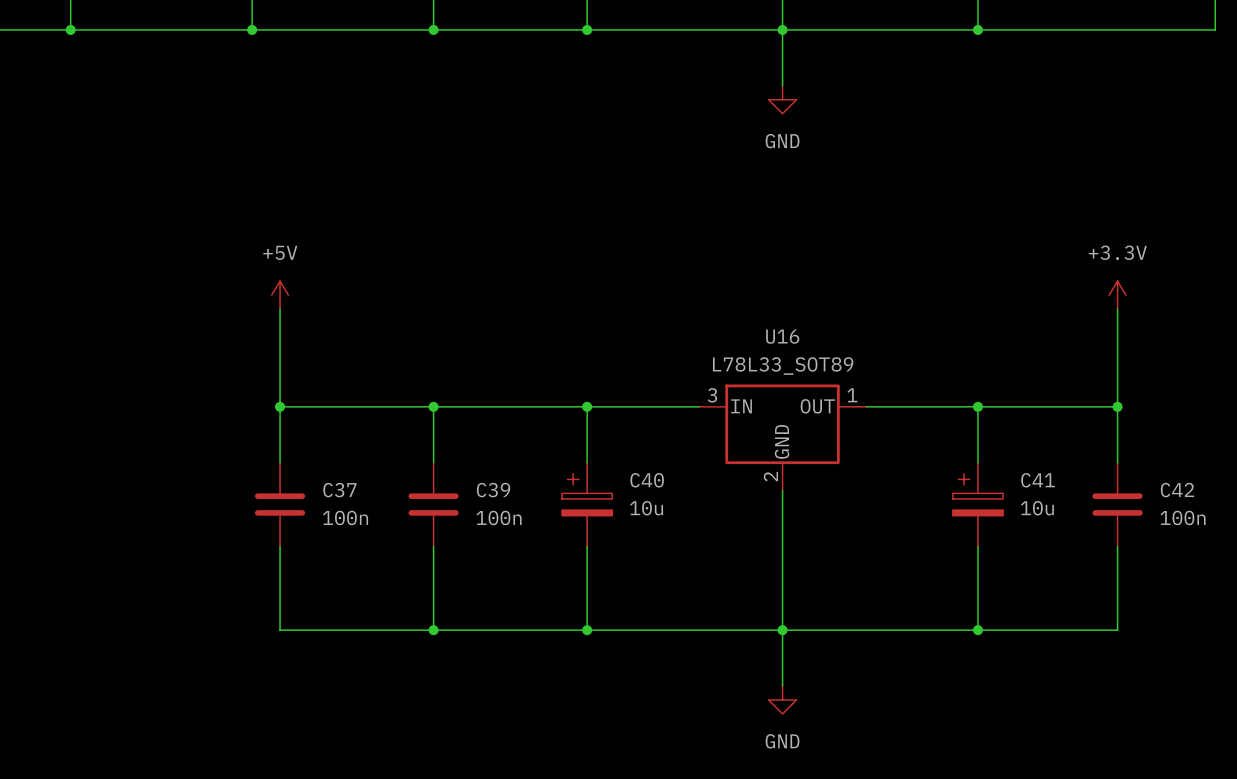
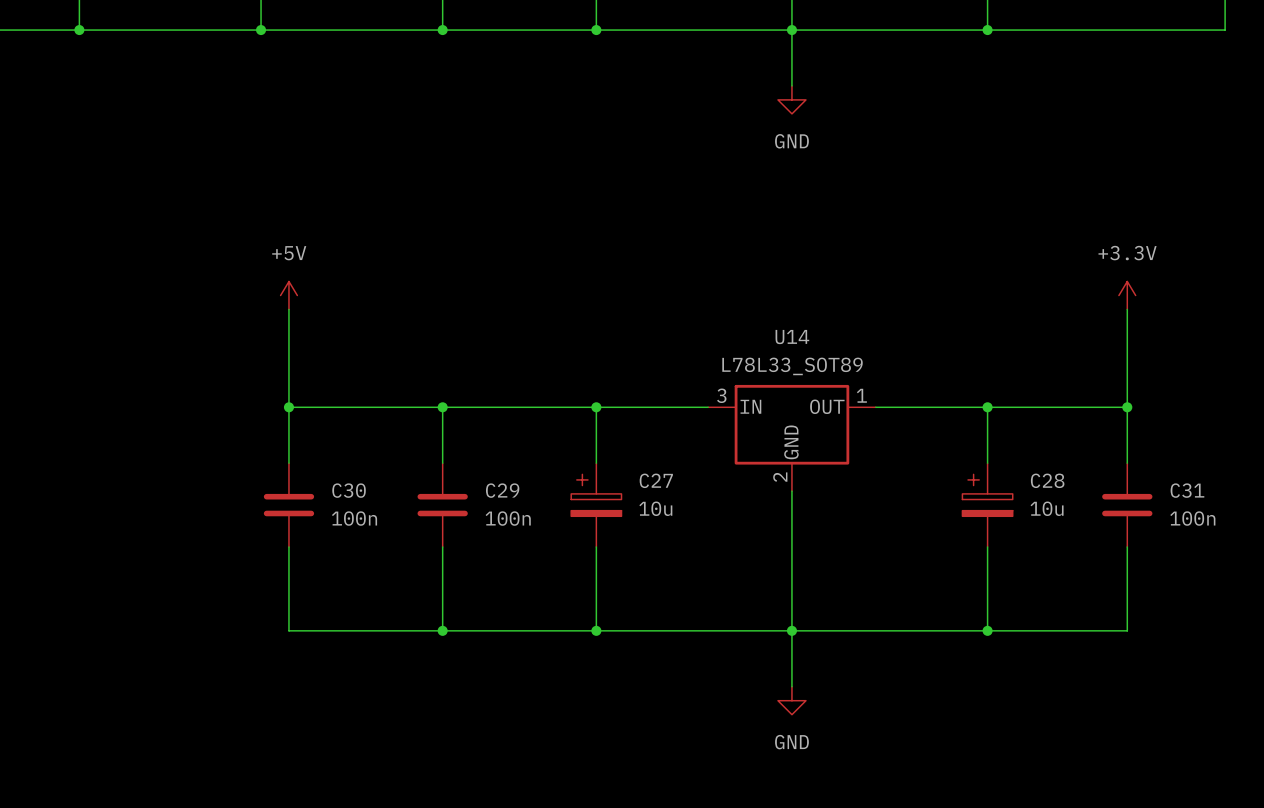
U16 name: U16 (782, 336) -> U14 (792, 337)
C40 name: C40 (647, 480) -> C27 (656, 480)
C41 name: C41 (1038, 480) -> C28 (1047, 480)
C37 name: C37 (339, 490) -> C30 (349, 490)
C39 name: C39 (493, 490) -> C29 (502, 490)
C42 name: C42 (1177, 490) -> C31 (1187, 490)

